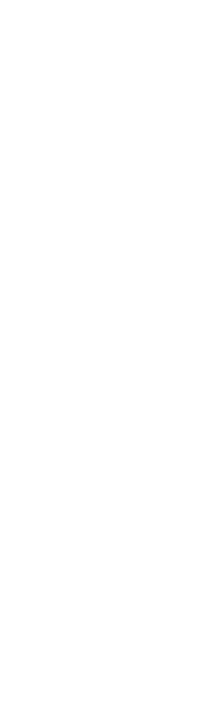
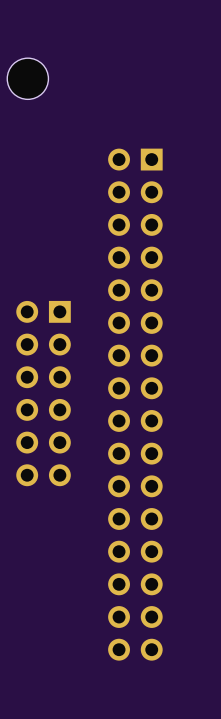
part: none -> (27, 78)
part: none -> (43, 393)
part: none -> (135, 404)

